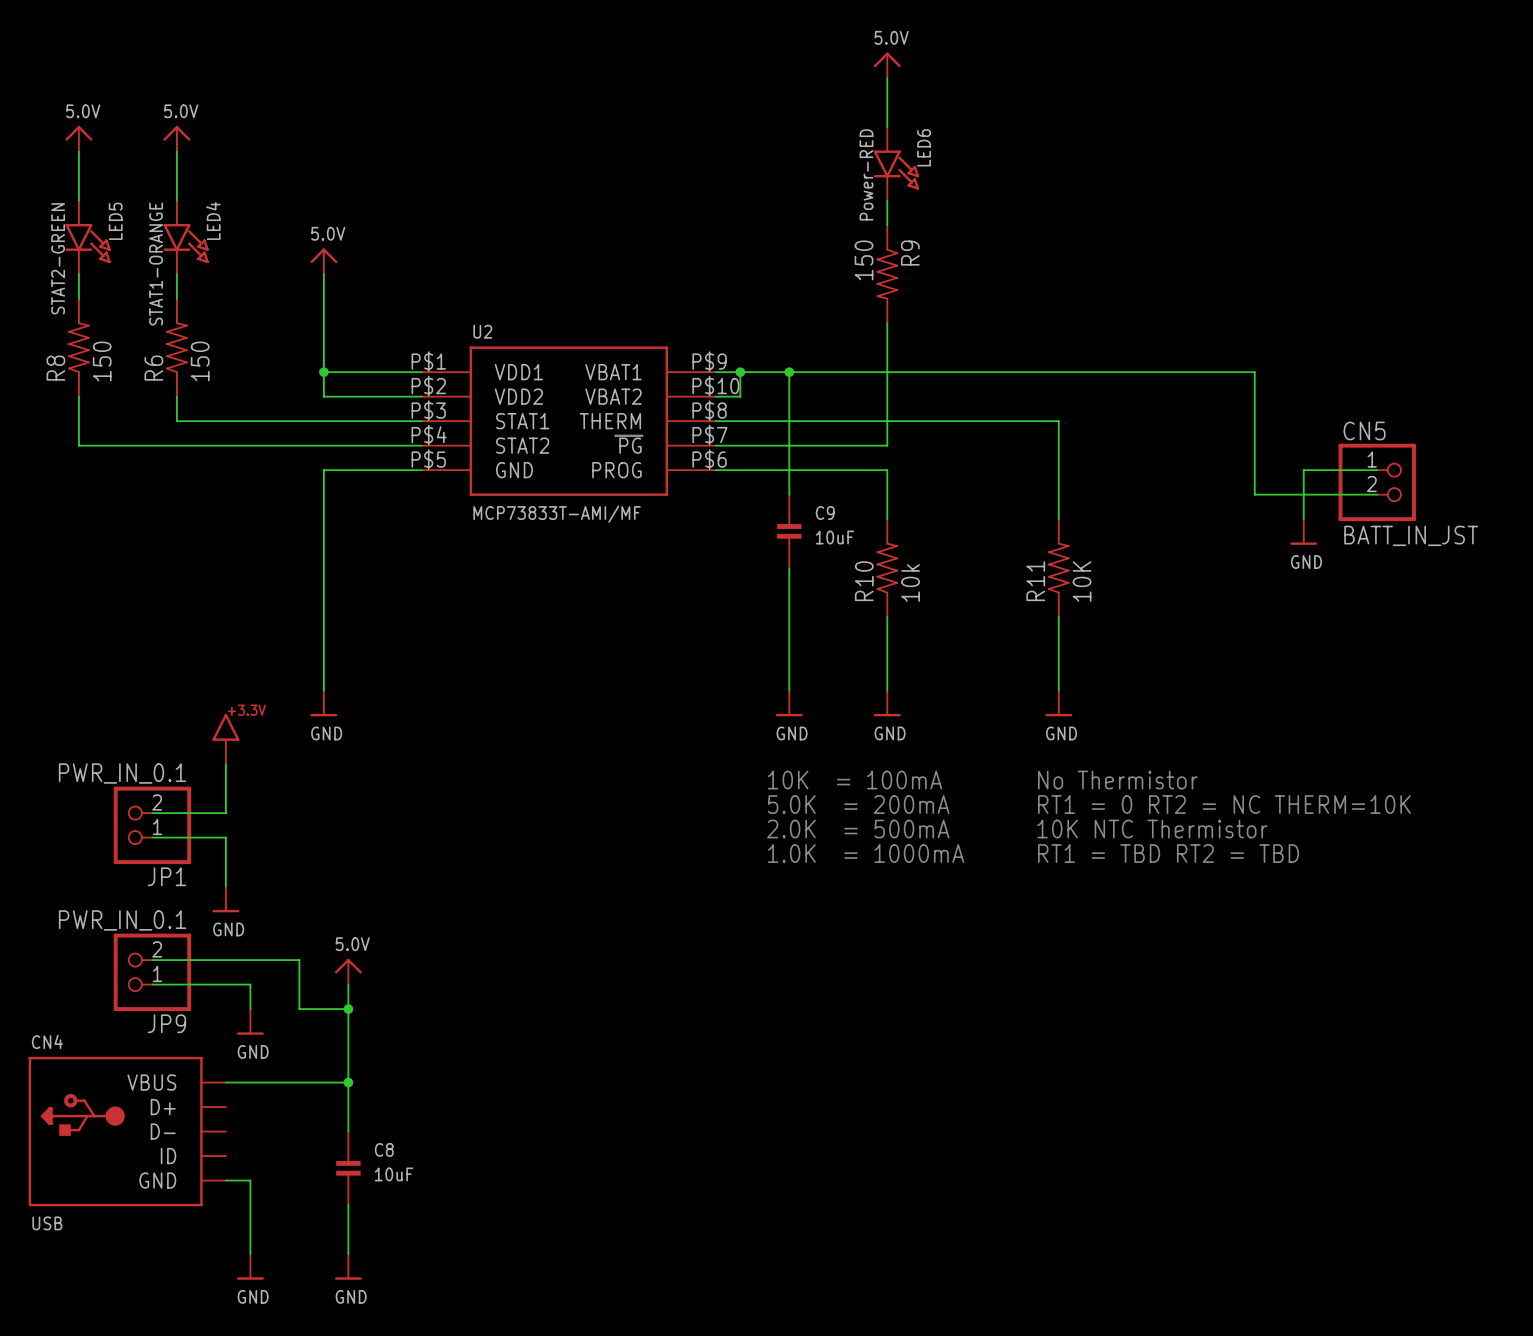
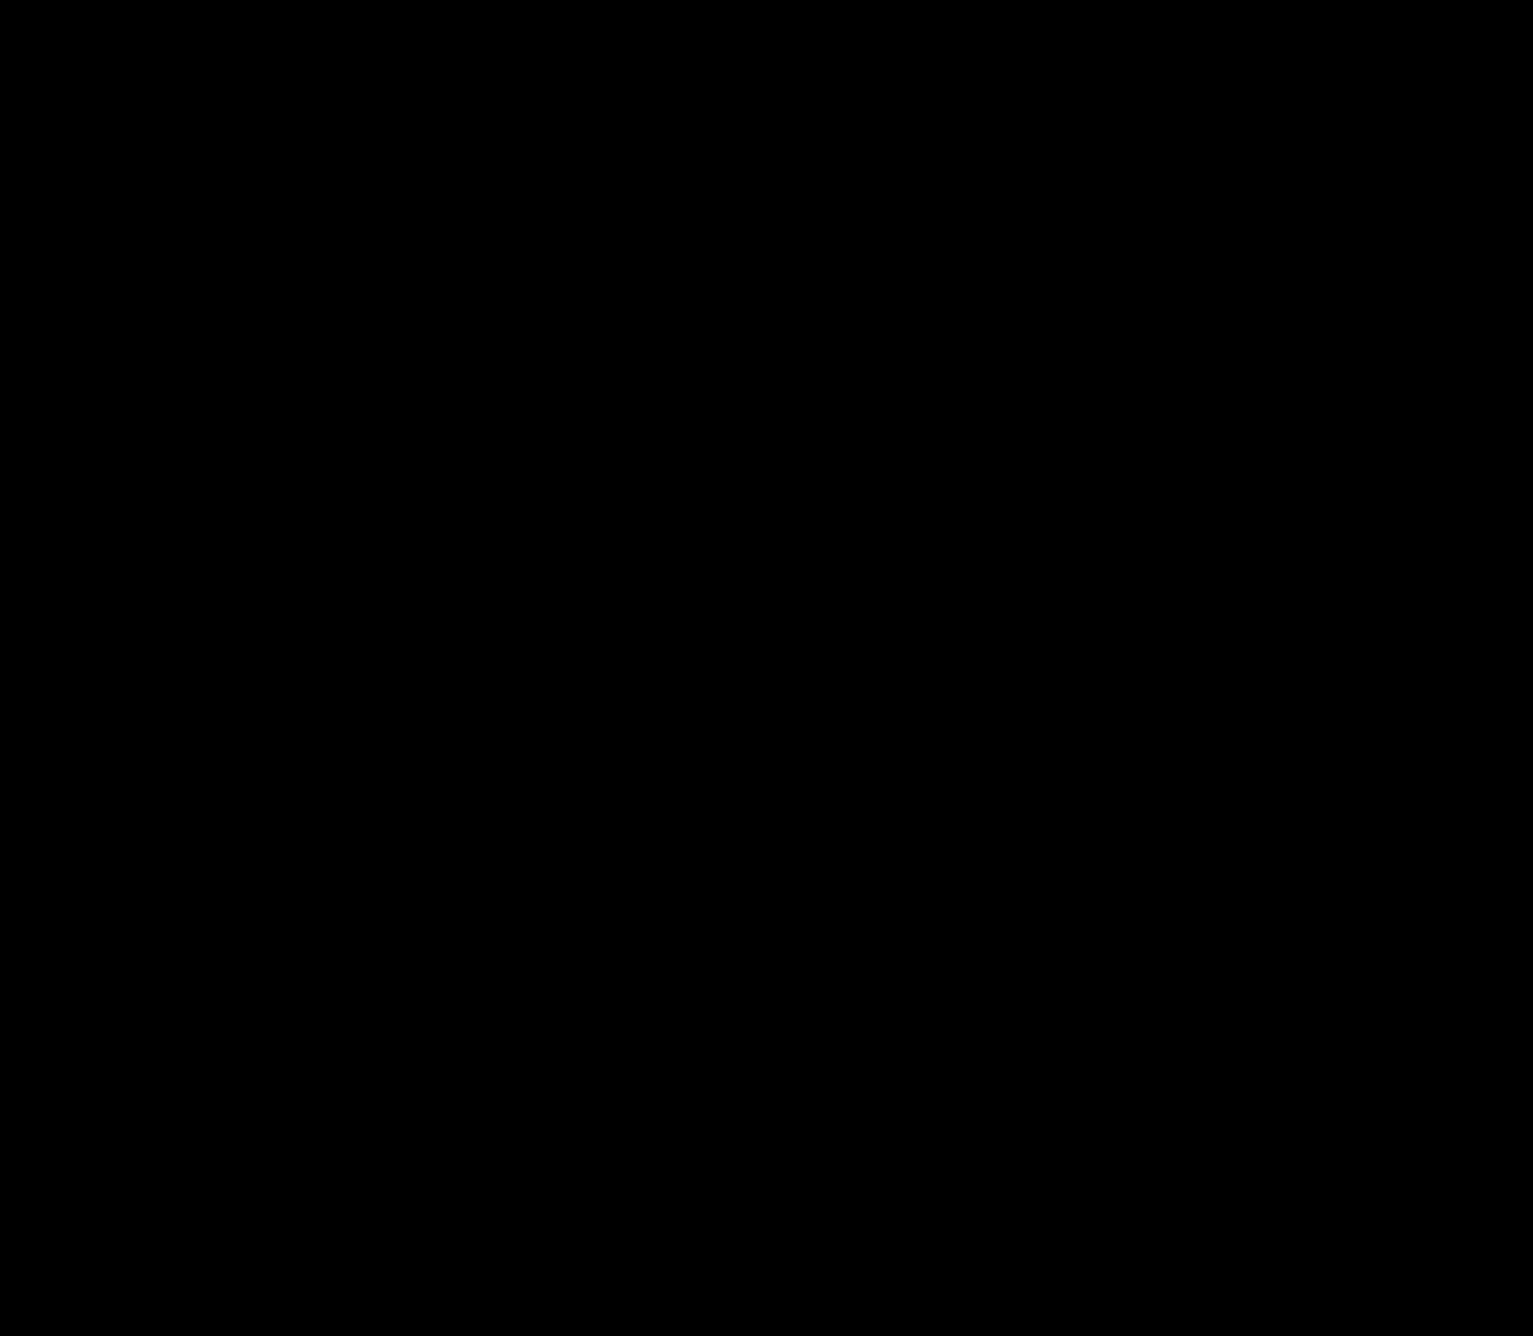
power symbol: 5.0V (887, 65) -> none
wire: (887, 78) (887, 127) -> none
power symbol: 5.0V (78, 138) -> none
power symbol: 5.0V (176, 138) -> none
wire: (78, 151) (78, 200) -> none
wire: (176, 151) (176, 200) -> none
LED6: Power-RED (896, 163) -> none
wire: (887, 200) (887, 225) -> none
LED5: STAT2-GREEN (88, 237) -> none
LED4: STAT1-ORANGE (186, 237) -> none
power symbol: 5.0V (323, 261) -> none
wire: (78, 274) (78, 298) -> none
wire: (176, 274) (176, 298) -> none
wire: (323, 274) (323, 396) (421, 396) -> none
R9: 150 (887, 274) -> none
wire: (887, 323) (887, 445) (715, 445) -> none
R8: 150 (78, 347) -> none
R6: 150 (176, 347) -> none
wire: (323, 372) (421, 372) -> none
junction: (323, 372) -> none
wire: (715, 372) (1254, 372) (1254, 494) (1377, 494) -> none
wire: (740, 372) (740, 396) (715, 396) -> none
junction: (740, 372) -> none
wire: (789, 372) (789, 494) -> none
junction: (789, 372) -> none
wire: (78, 396) (78, 445) (421, 445) -> none
wire: (176, 396) (176, 421) (421, 421) -> none
U2: MCP73833T-AMI/MF (568, 421) -> none
wire: (715, 421) (1058, 421) (1058, 519) -> none
wire: (421, 470) (323, 470) (323, 690) -> none
wire: (715, 470) (887, 470) (887, 519) -> none
wire: (1377, 470) (1303, 470) (1303, 519) -> none
CN5: BATT_IN_JST (1377, 482) -> none
C9: 10uF (789, 531) -> none
power symbol: GND (1303, 532) -> none
wire: (789, 568) (789, 690) -> none
R10: 10k (887, 568) -> none
R11: 10K (1058, 568) -> none
wire: (887, 617) (887, 690) -> none
wire: (1058, 617) (1058, 690) -> none
power symbol: GND (323, 703) -> none
power symbol: GND (789, 703) -> none
power symbol: GND (887, 703) -> none
power symbol: GND (1058, 703) -> none
power symbol: (225, 739) -> none
wire: (225, 764) (225, 813) (152, 813) -> none
text: 10K = 100mA (855, 780) -> none
text: No Thermistor (1117, 780) -> none
text: 5.0K = 200mA (858, 804) -> none
text: RT1 = 0 RT2 = NC THERM=10K (1224, 804) -> none
JP1: PWR_IN_0.1 (152, 825) -> none
text: 2.0K = 500mA (858, 829) -> none
text: 10K NTC Thermistor (1152, 829) -> none
wire: (152, 837) (225, 837) (225, 886) -> none
text: 1.0K = 1000mA (866, 853) -> none
text: RT1 = TBD RT2 = TBD (1168, 853) -> none
power symbol: GND (225, 899) -> none
wire: (152, 960) (299, 960) (299, 1009) (348, 1009) -> none
power symbol: 5.0V (348, 971) -> none
JP9: PWR_IN_0.1 (152, 972) -> none
wire: (152, 984) (250, 984) (250, 1009) -> none
wire: (348, 984) (348, 1131) -> none
junction: (348, 1009) -> none
power symbol: GND (250, 1021) -> none
wire: (225, 1082) (348, 1082) -> none
junction: (348, 1082) -> none
CN4: USB (127, 1131) -> none
C8: 10uF (348, 1168) -> none
wire: (225, 1180) (250, 1180) (250, 1254) -> none
wire: (348, 1205) (348, 1254) -> none
power symbol: GND (250, 1266) -> none
power symbol: GND (348, 1266) -> none

